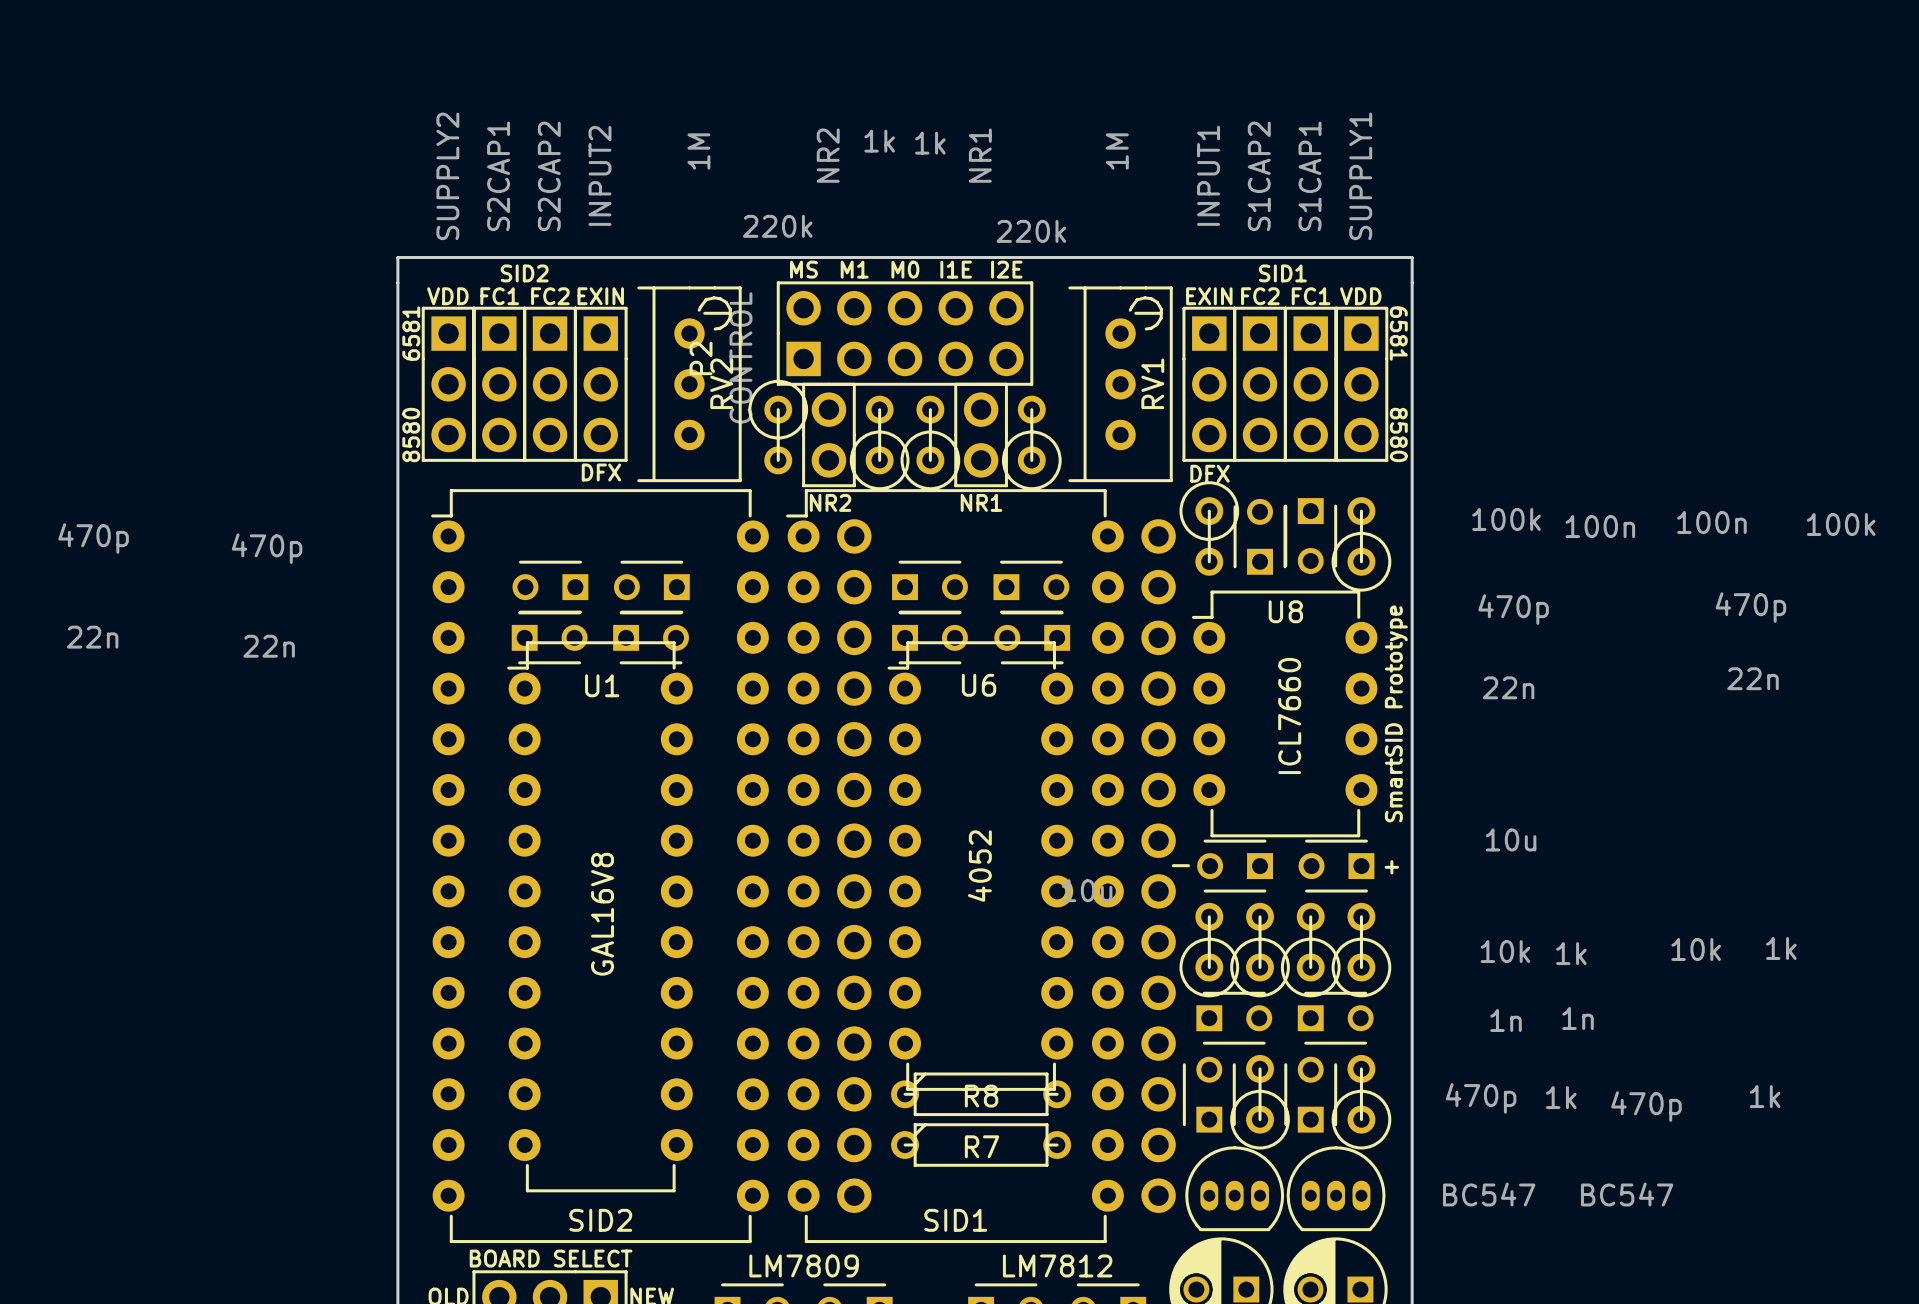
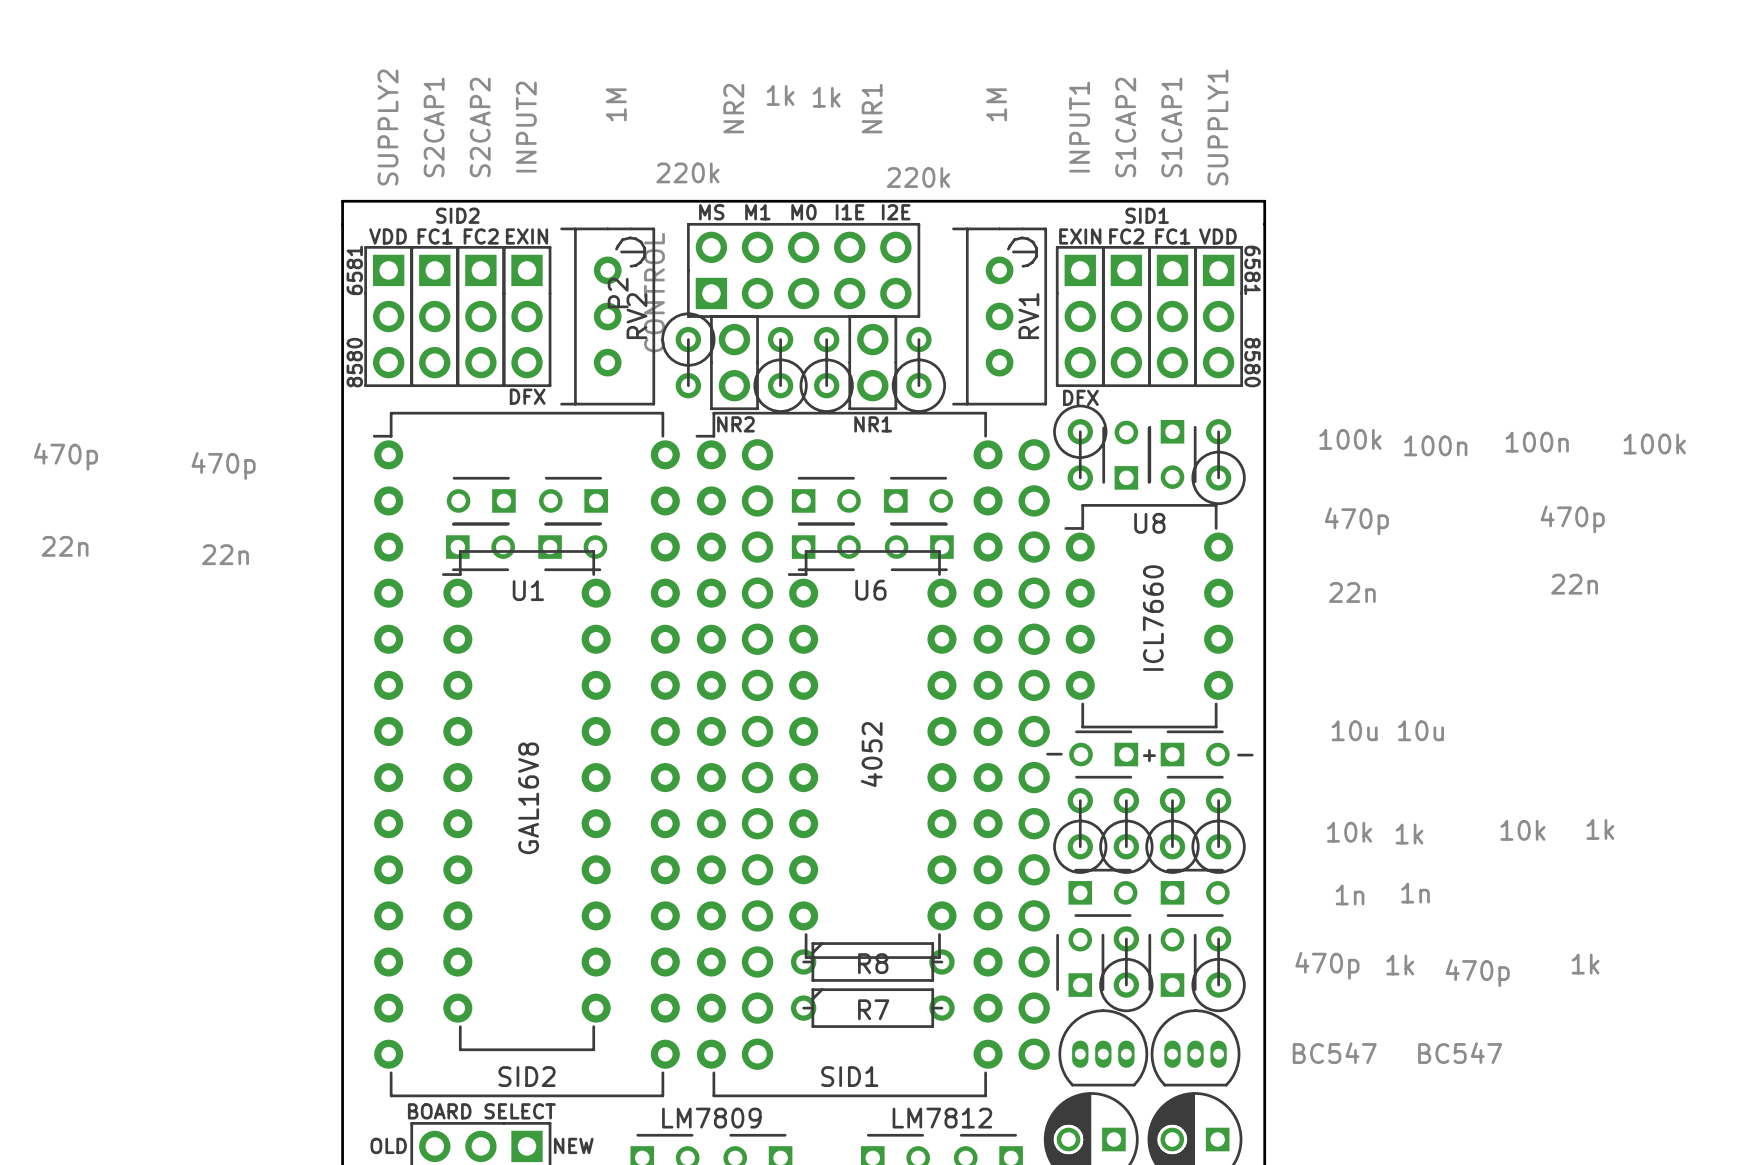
text: SmartSID Prototype (1396, 713) -> none
part rotation: 0° (1336, 866) -> 180° (1195, 754)
text: none -> + (1149, 755)
text: + (1391, 867) -> - (1245, 755)

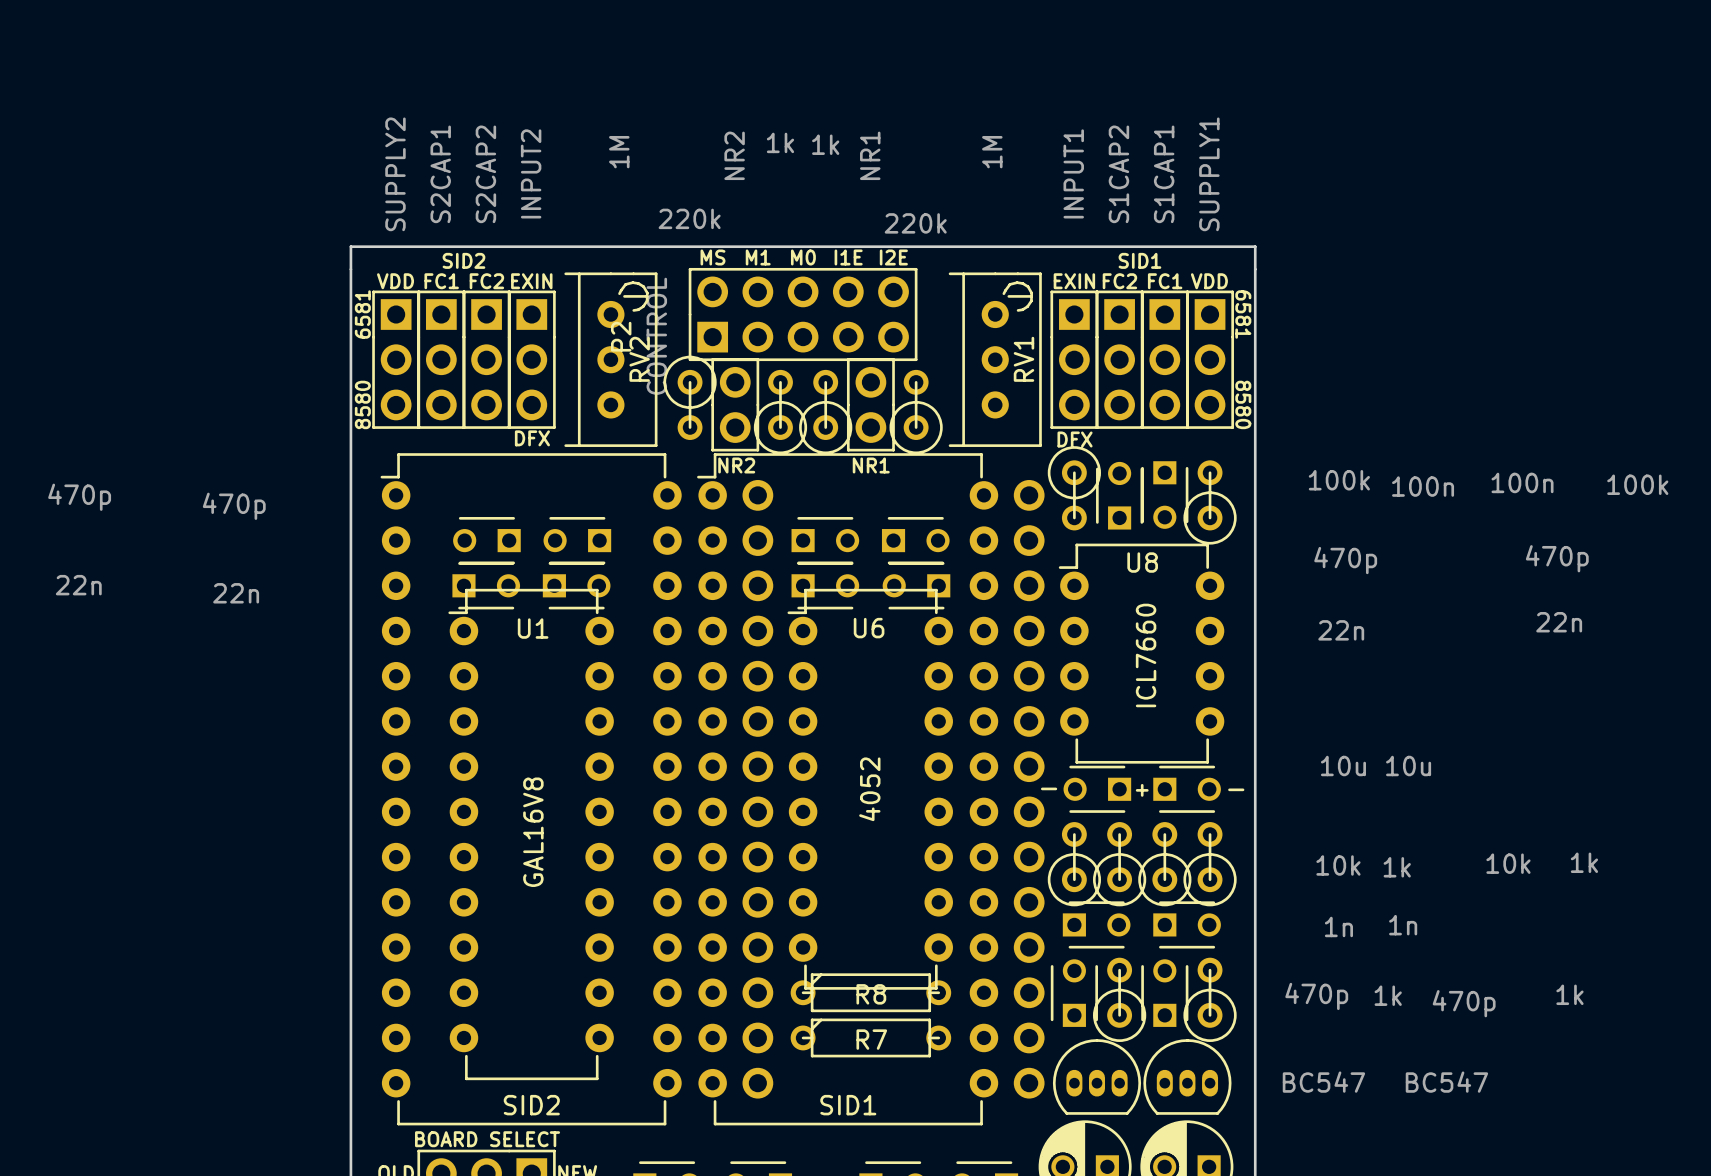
text: LM7809 (711, 1118) -> none
text: LM7812 (942, 1118) -> none

